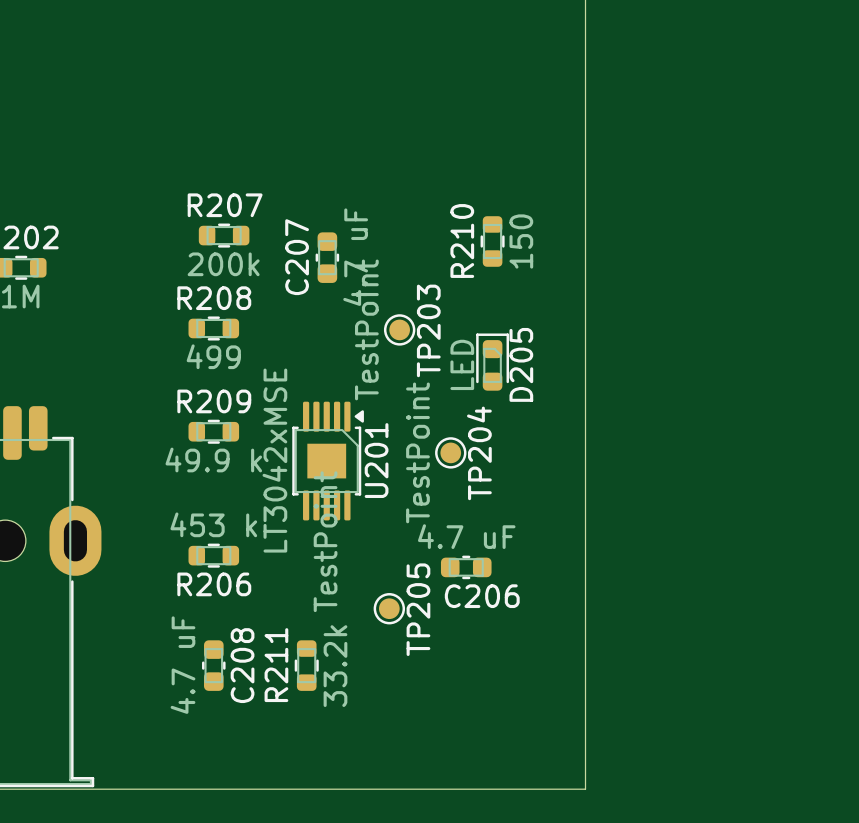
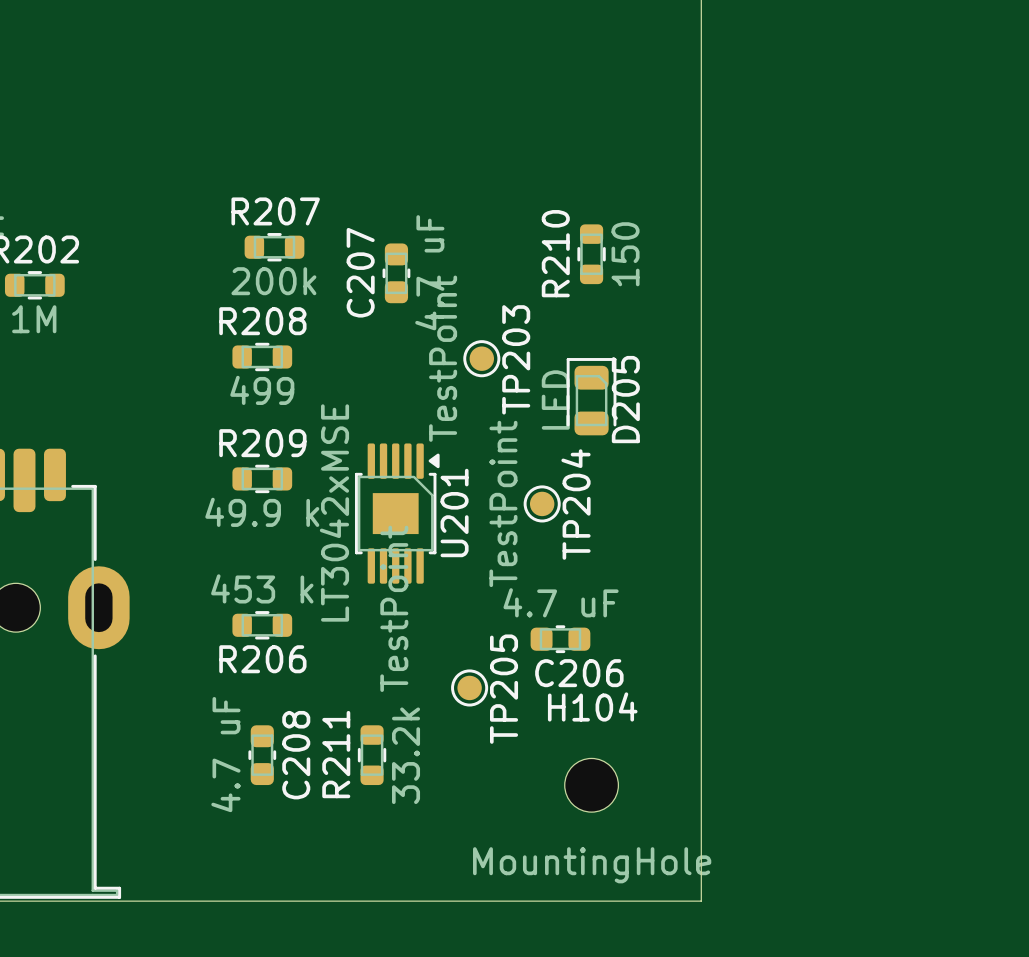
D205 footprint: [476, 333, 509, 391] -> [566, 358, 617, 436]
H104: none -> MountingHole (591, 785)

